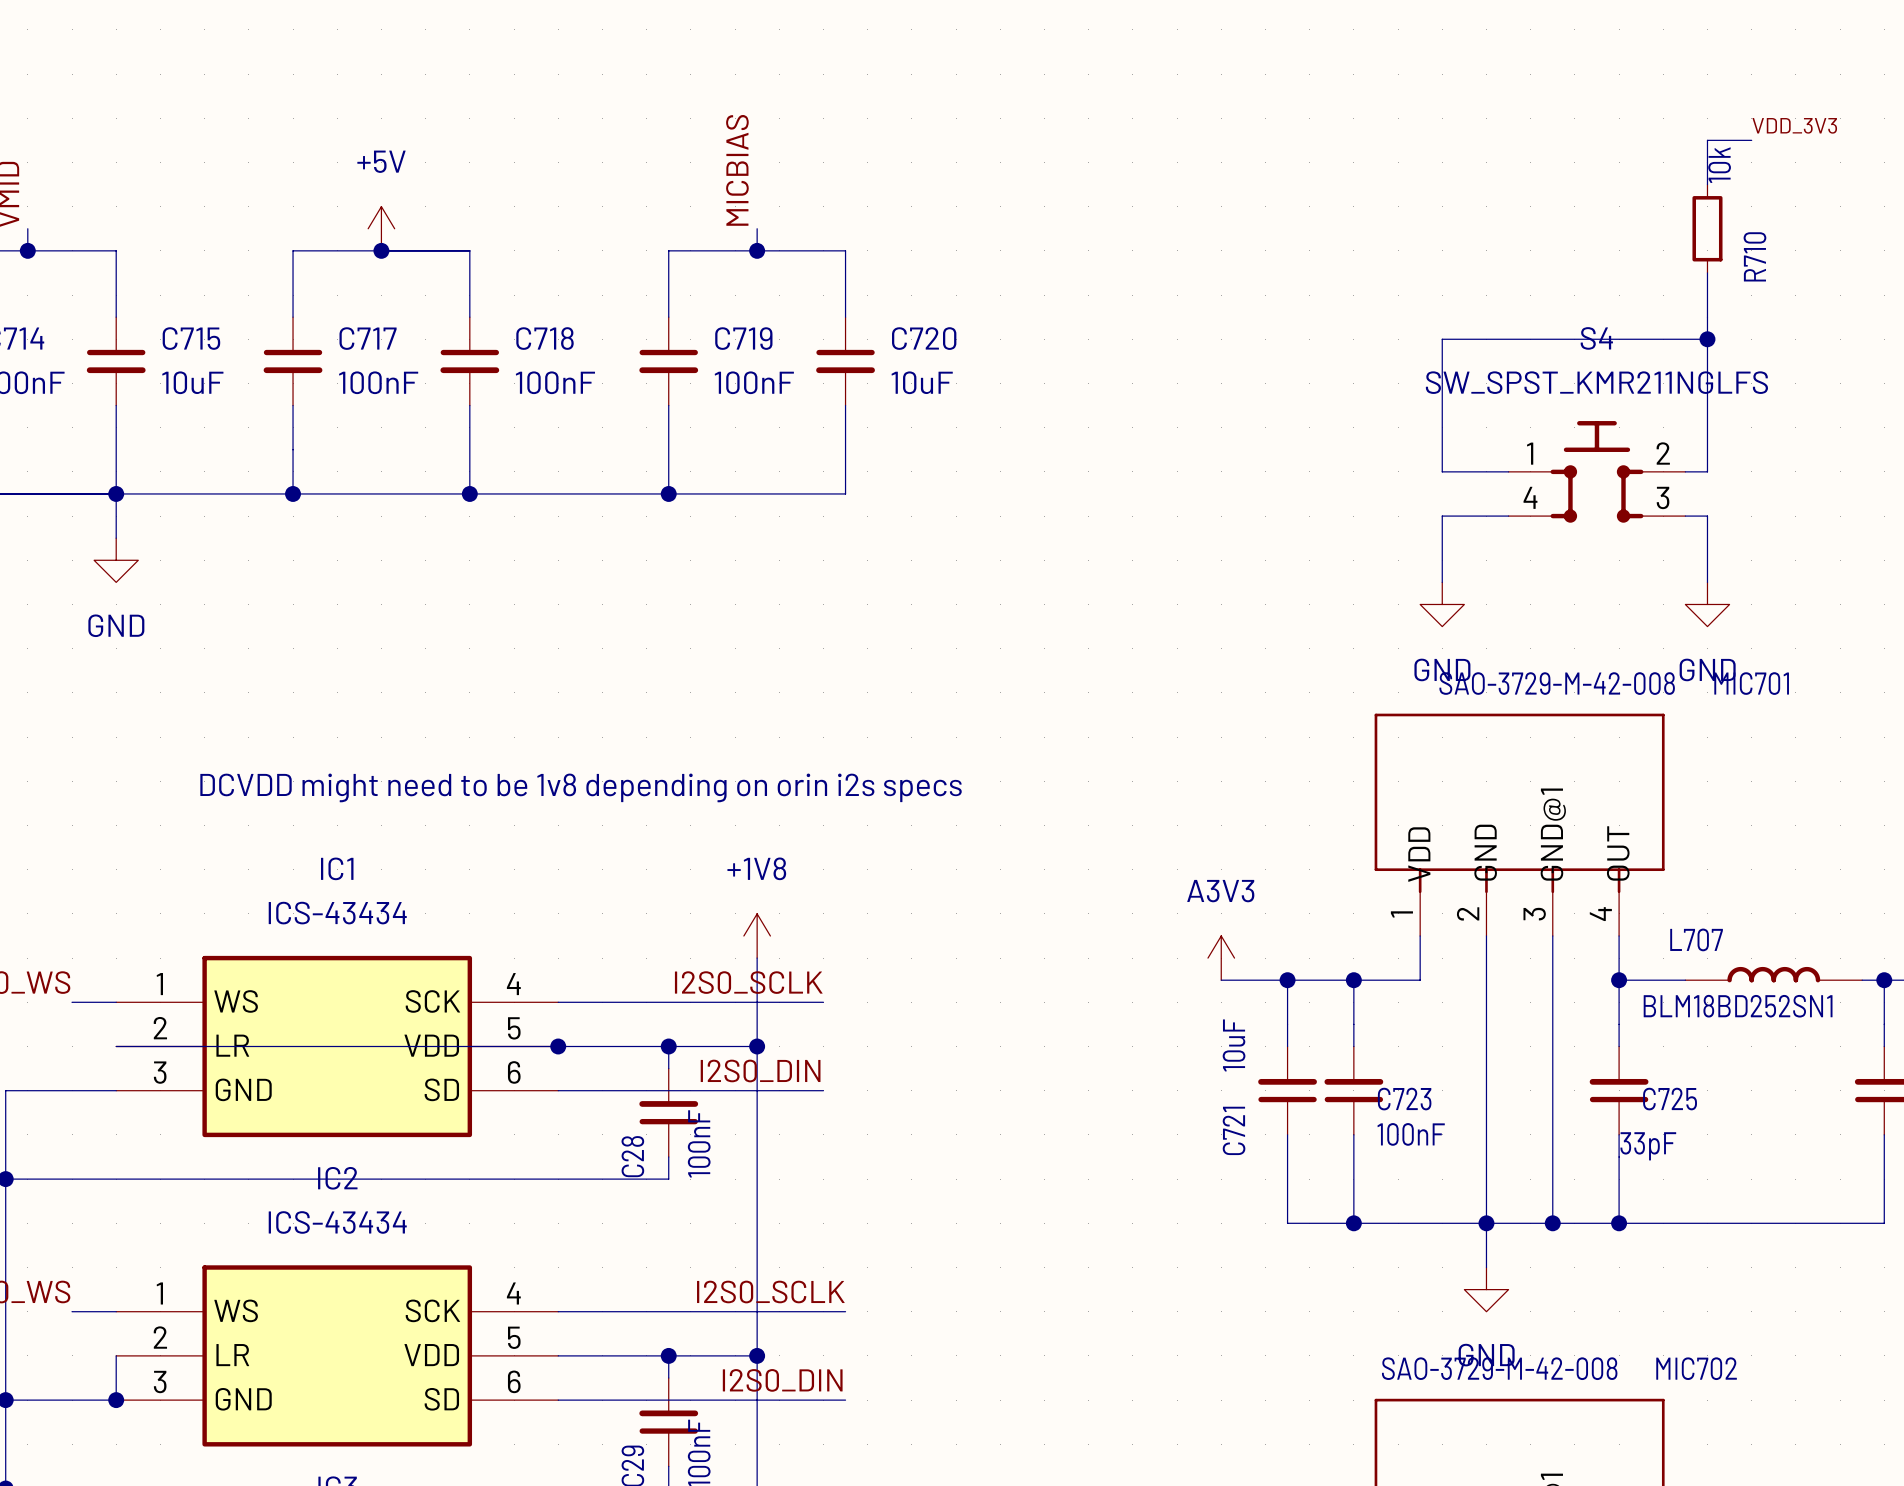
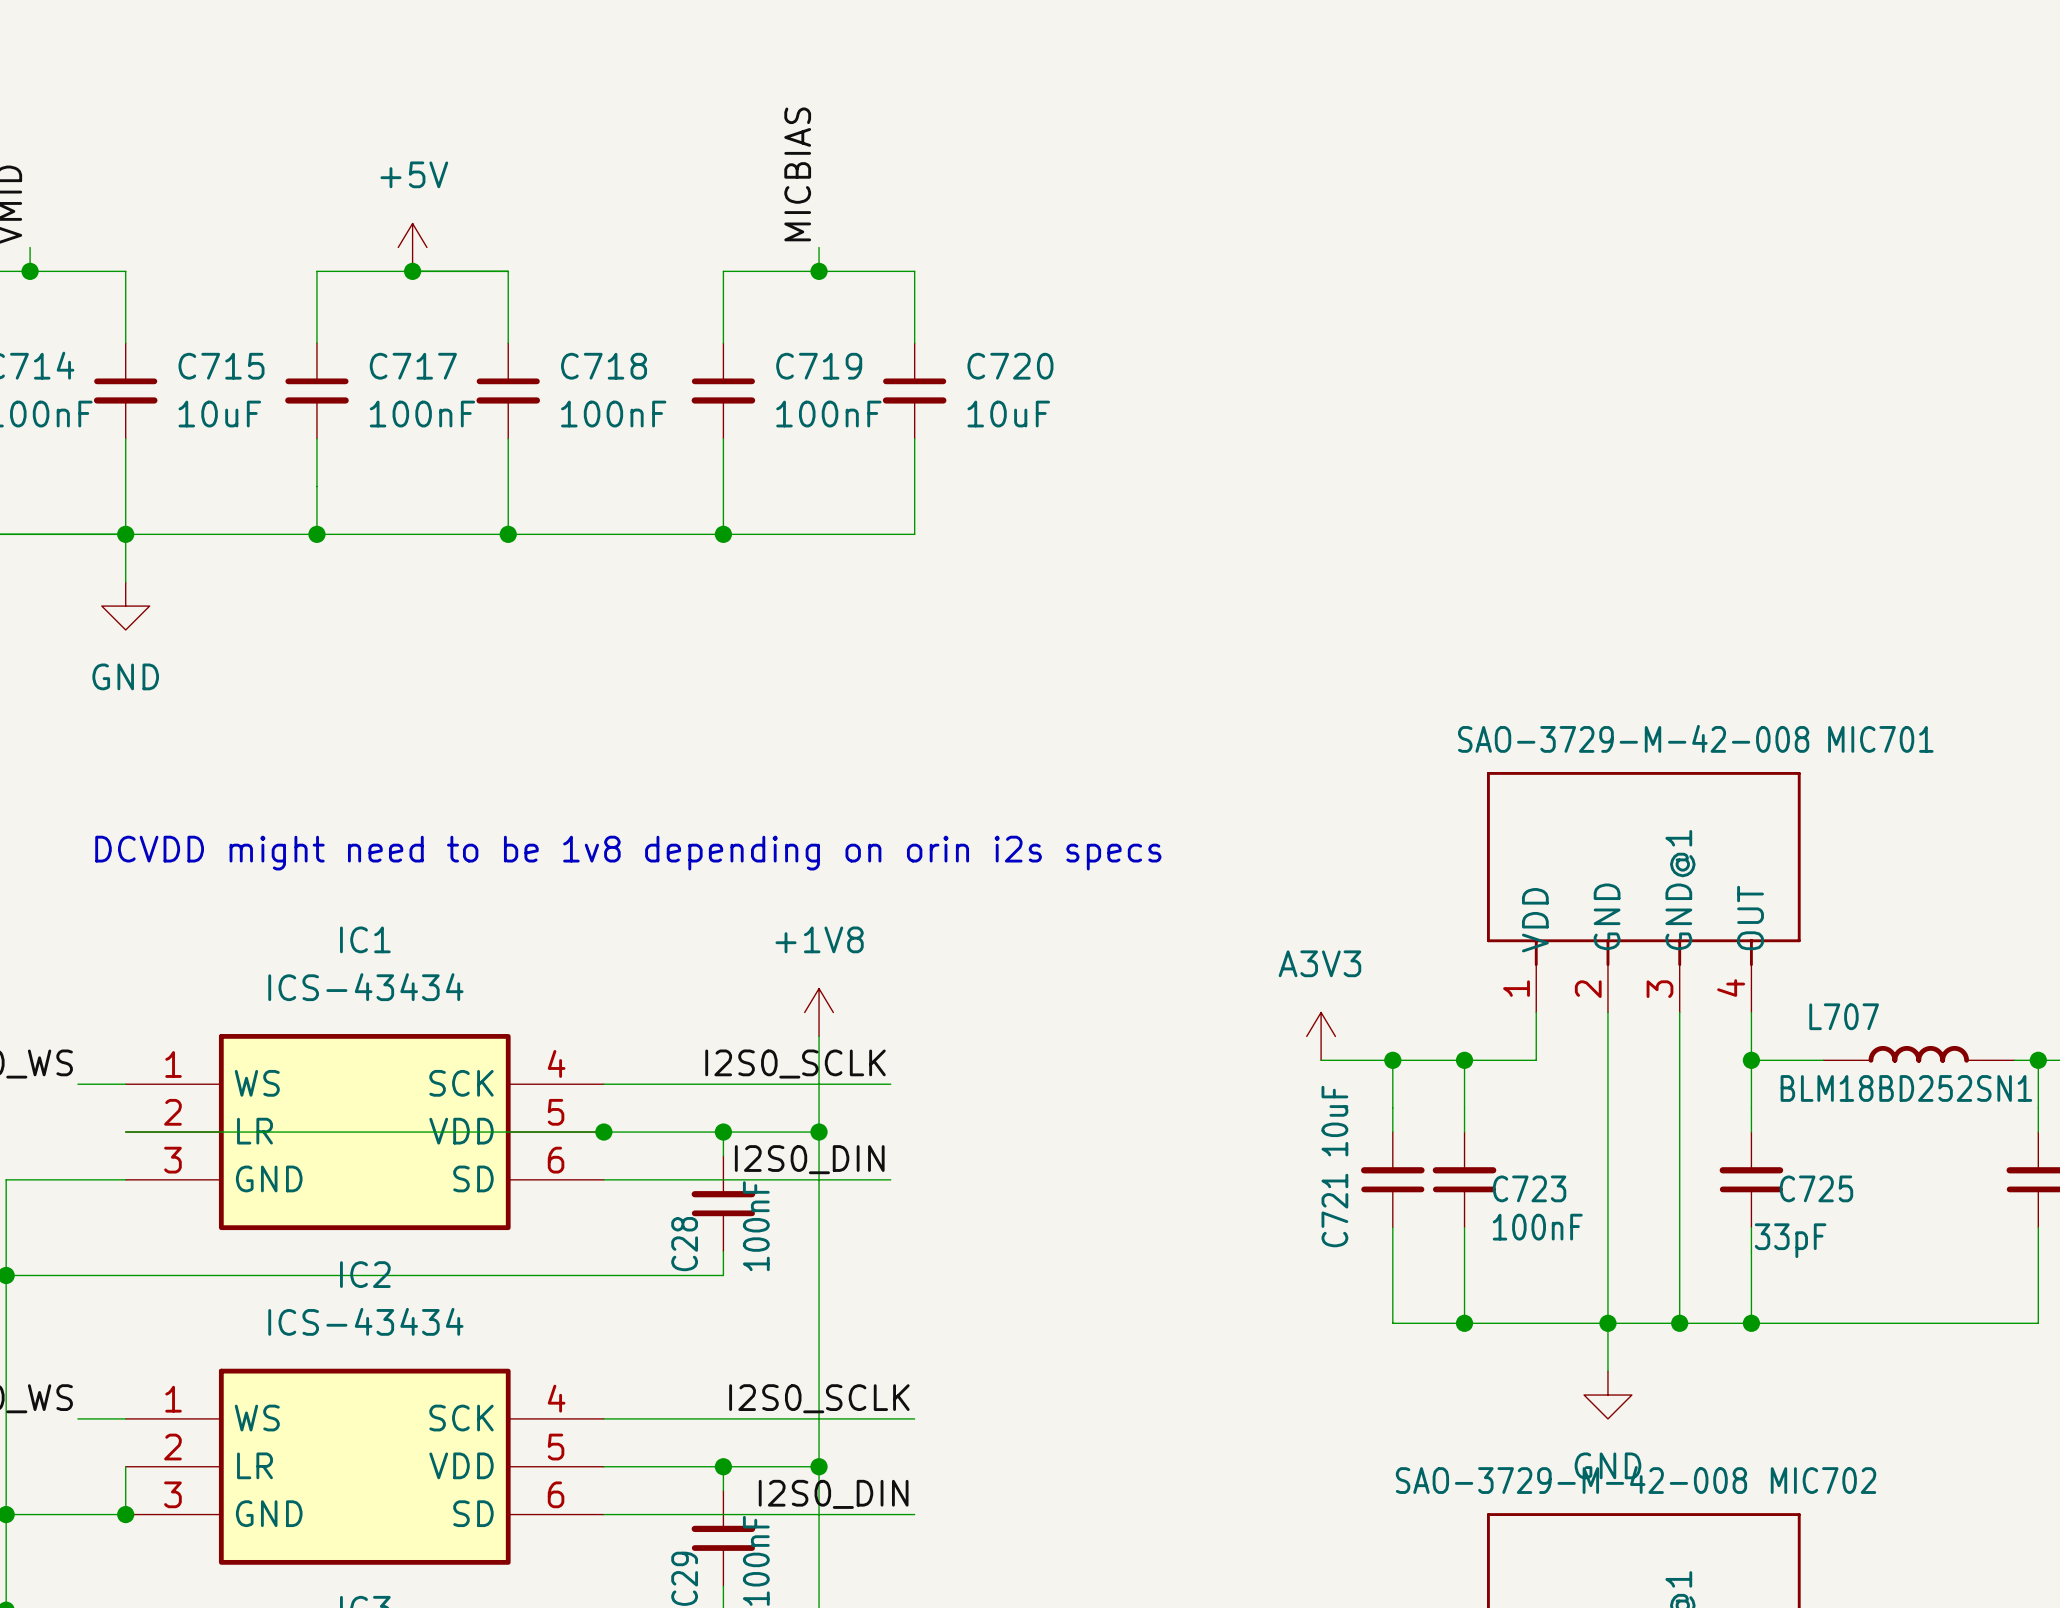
label: VDD_3V3 (1794, 125) -> none
wire: (1751, 140) (1707, 140) (1707, 184) -> none
R710: 10k (1707, 228) -> none
wire: (1707, 272) (1707, 471) (1685, 471) -> none
wire: (1707, 339) (1442, 339) (1442, 471) (1508, 471) -> none
junction: (1707, 339) -> none
S4: SW_SPST_KMR211NGLFS (1596, 471) -> none
wire: (1508, 516) (1442, 516) (1442, 582) -> none
wire: (1685, 516) (1707, 516) (1707, 582) -> none
power symbol: GND (1442, 604) -> none
power symbol: GND (1707, 604) -> none

